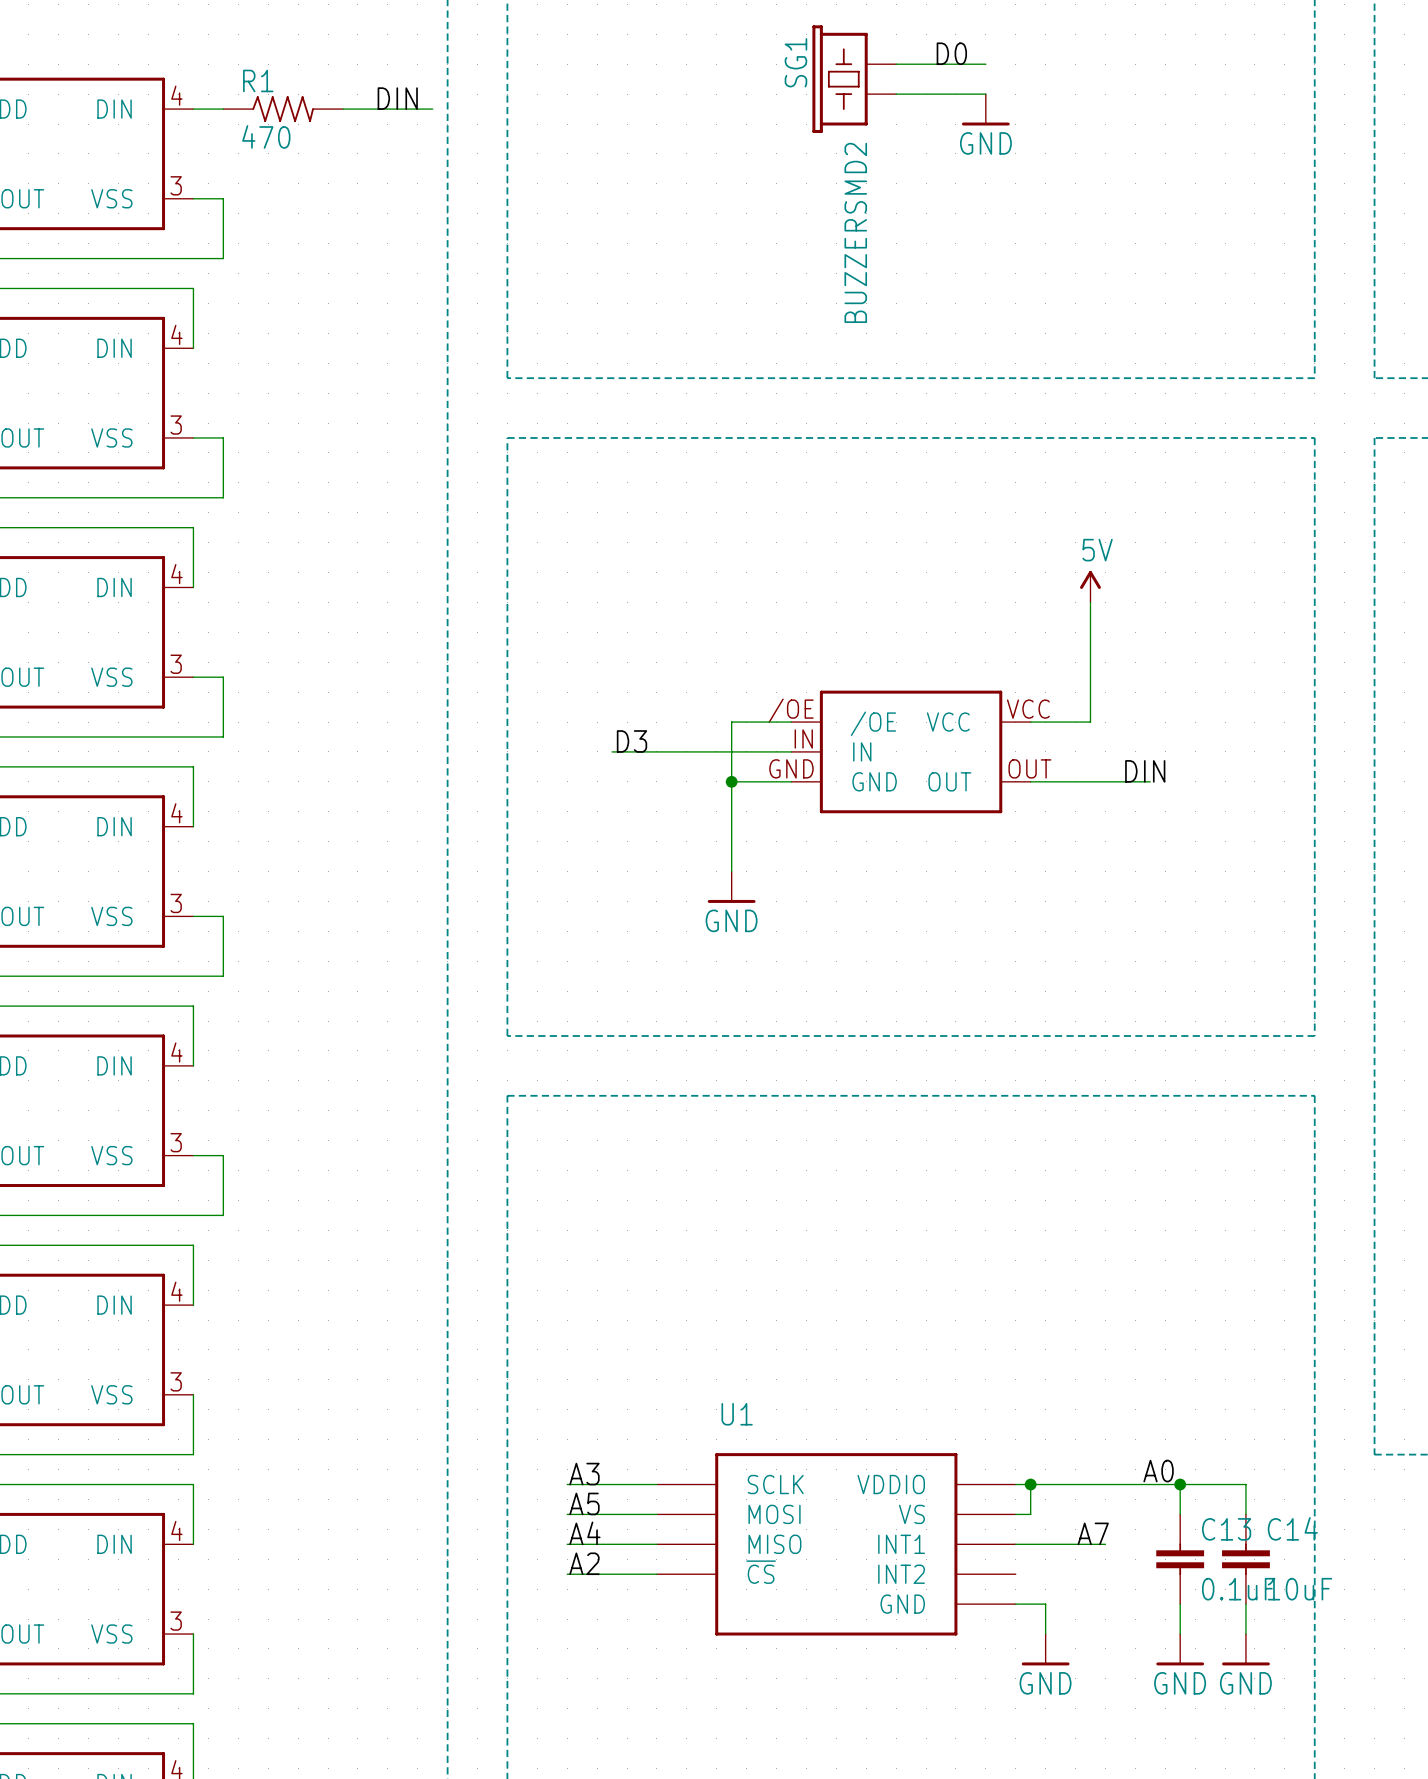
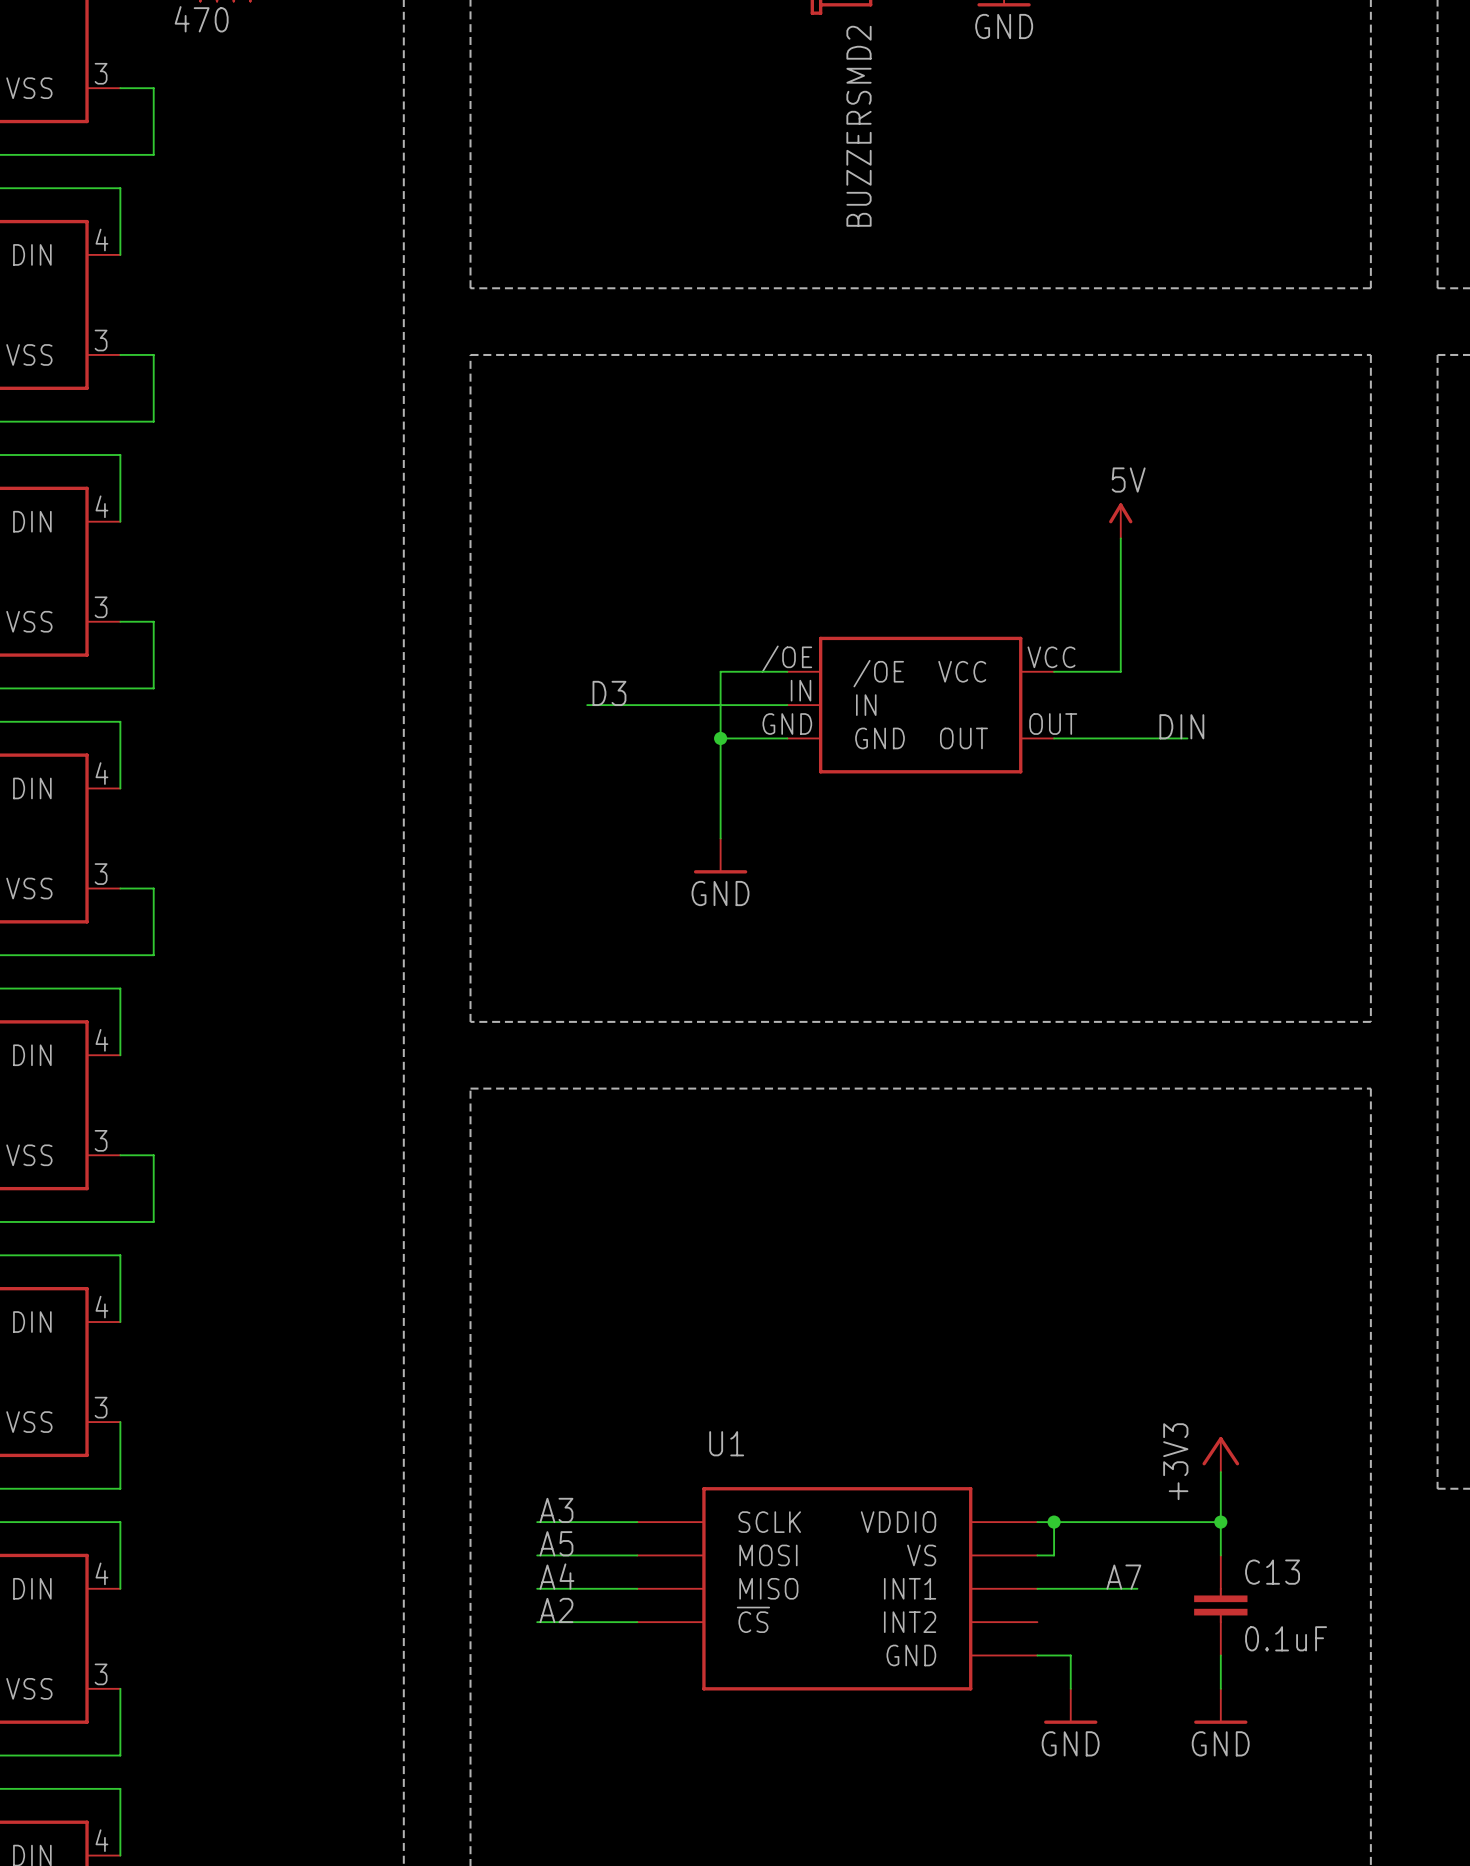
power symbol: none -> +3V3 (1220, 1454)
label: A0 (1158, 1471) -> none
wire: (1180, 1484) (1245, 1484) (1245, 1514) -> (1220, 1522) (1220, 1472)
C14: 10uF (1245, 1559) -> none
wire: (1245, 1604) (1245, 1634) -> none
power symbol: GND (1245, 1649) -> none

